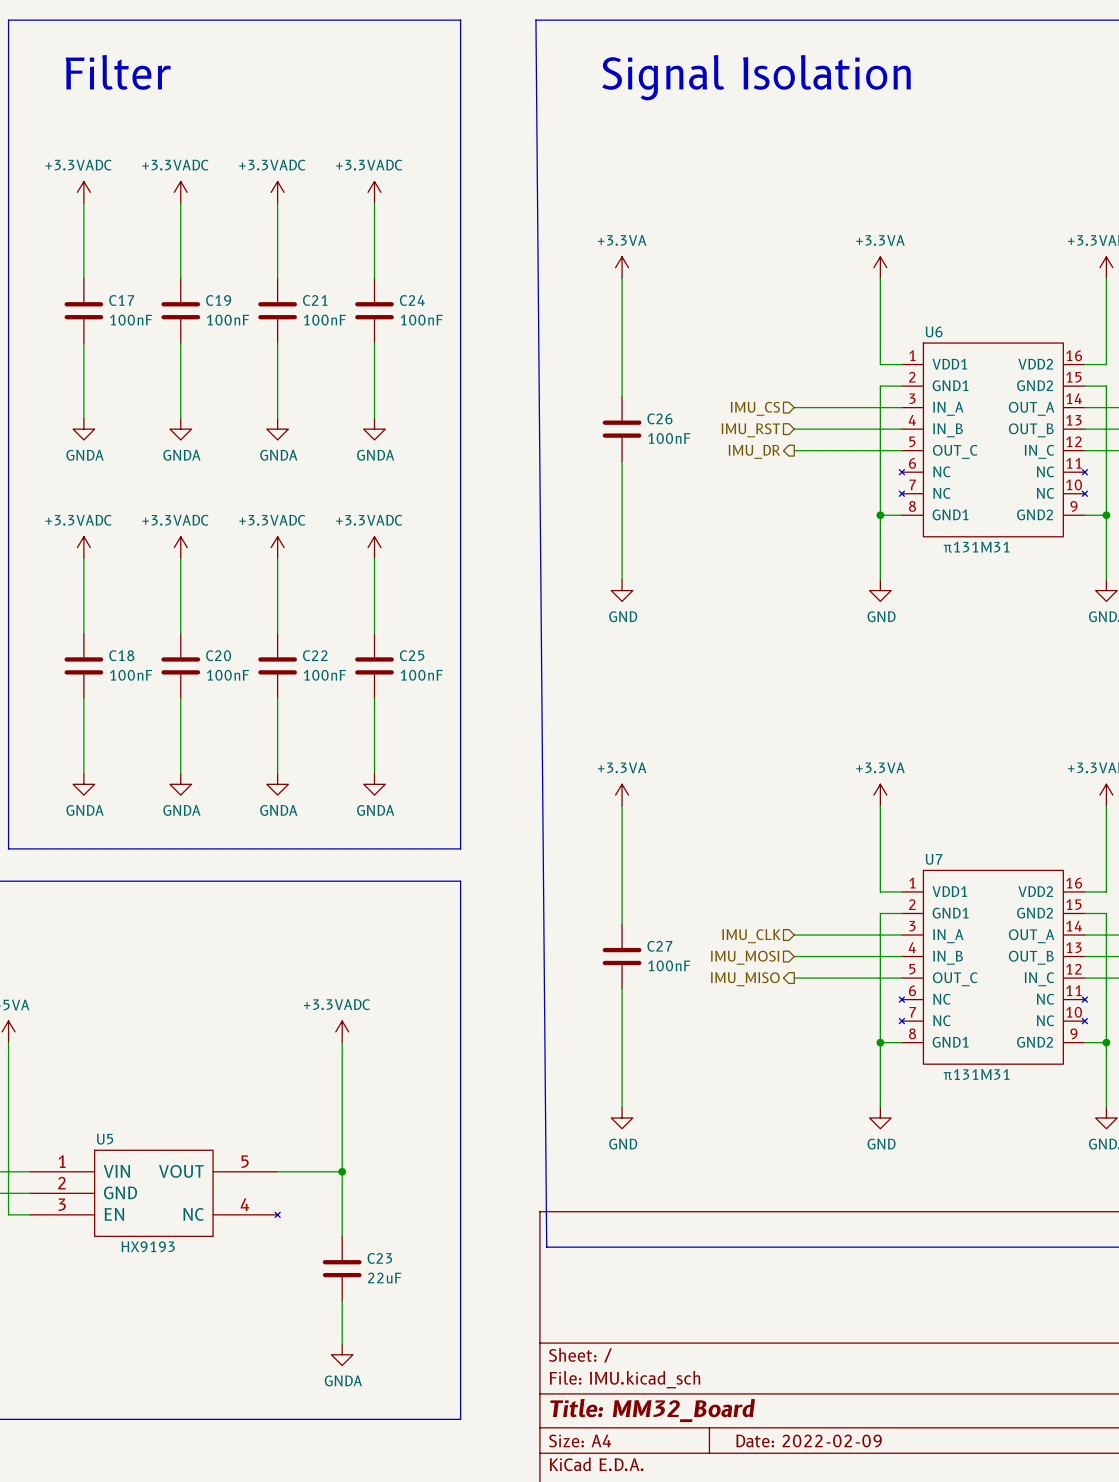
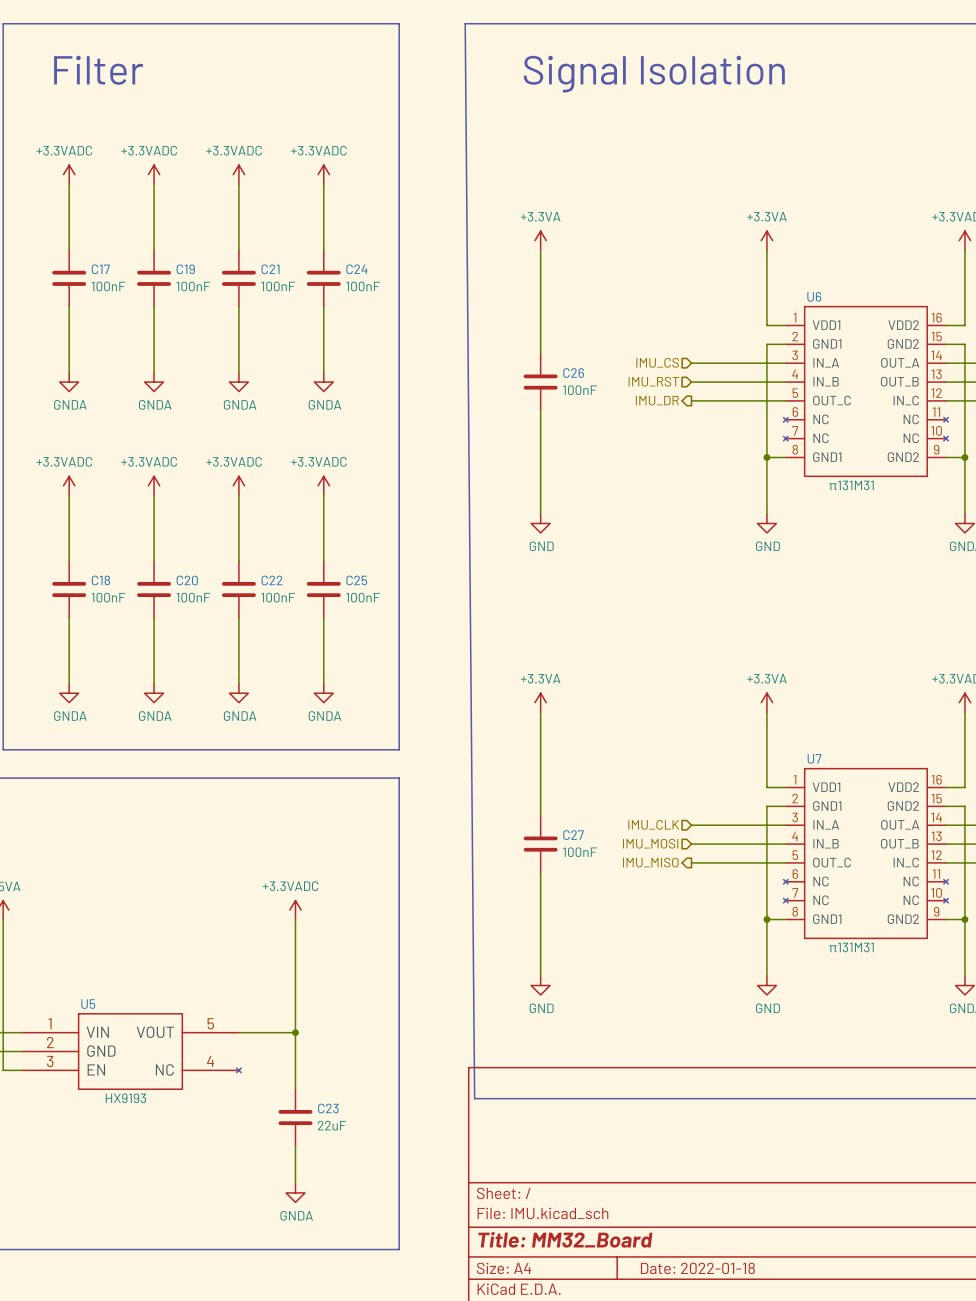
title block: Date: 2022-02-09 (809, 1441) -> Date: 2022-01-18 (697, 1268)

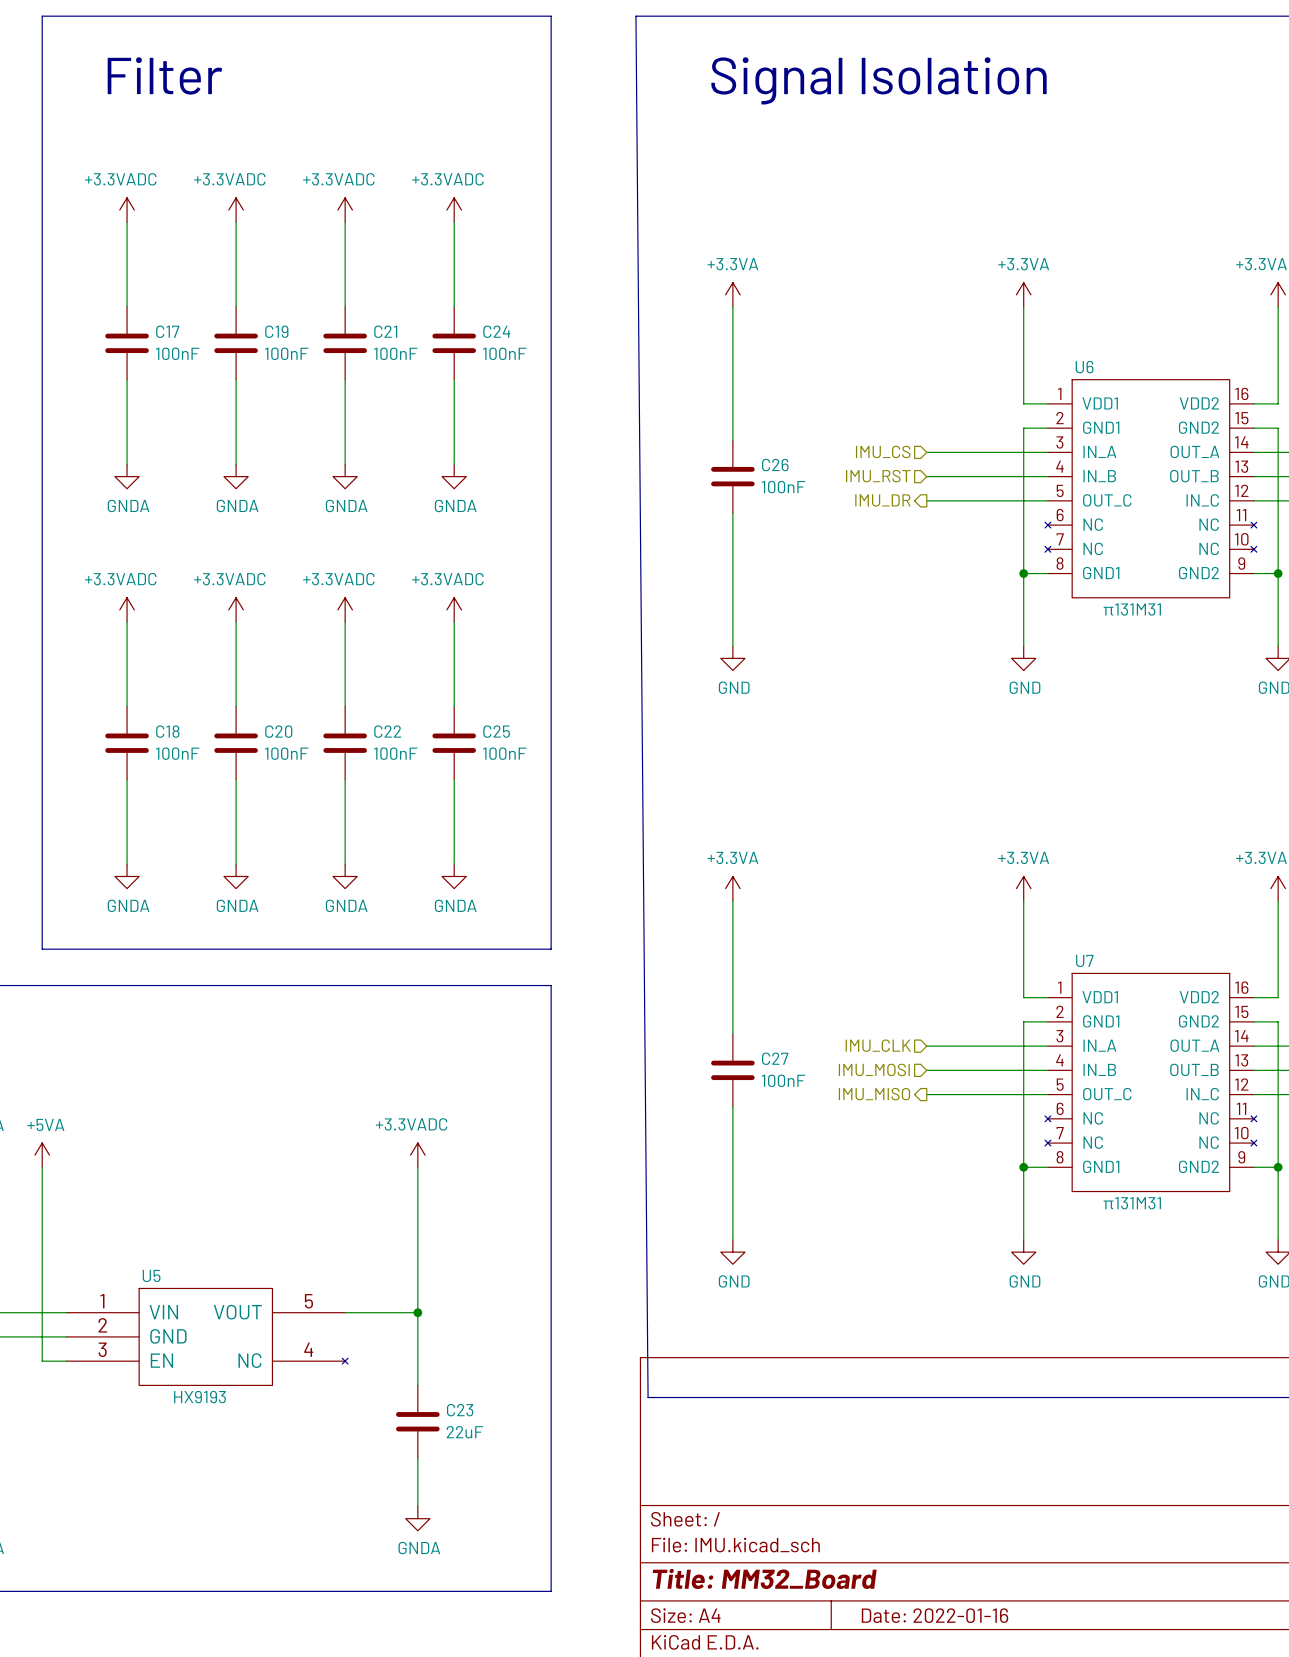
title block: Date: 2022-01-18 (697, 1268) -> Date: 2022-01-16 (935, 1615)

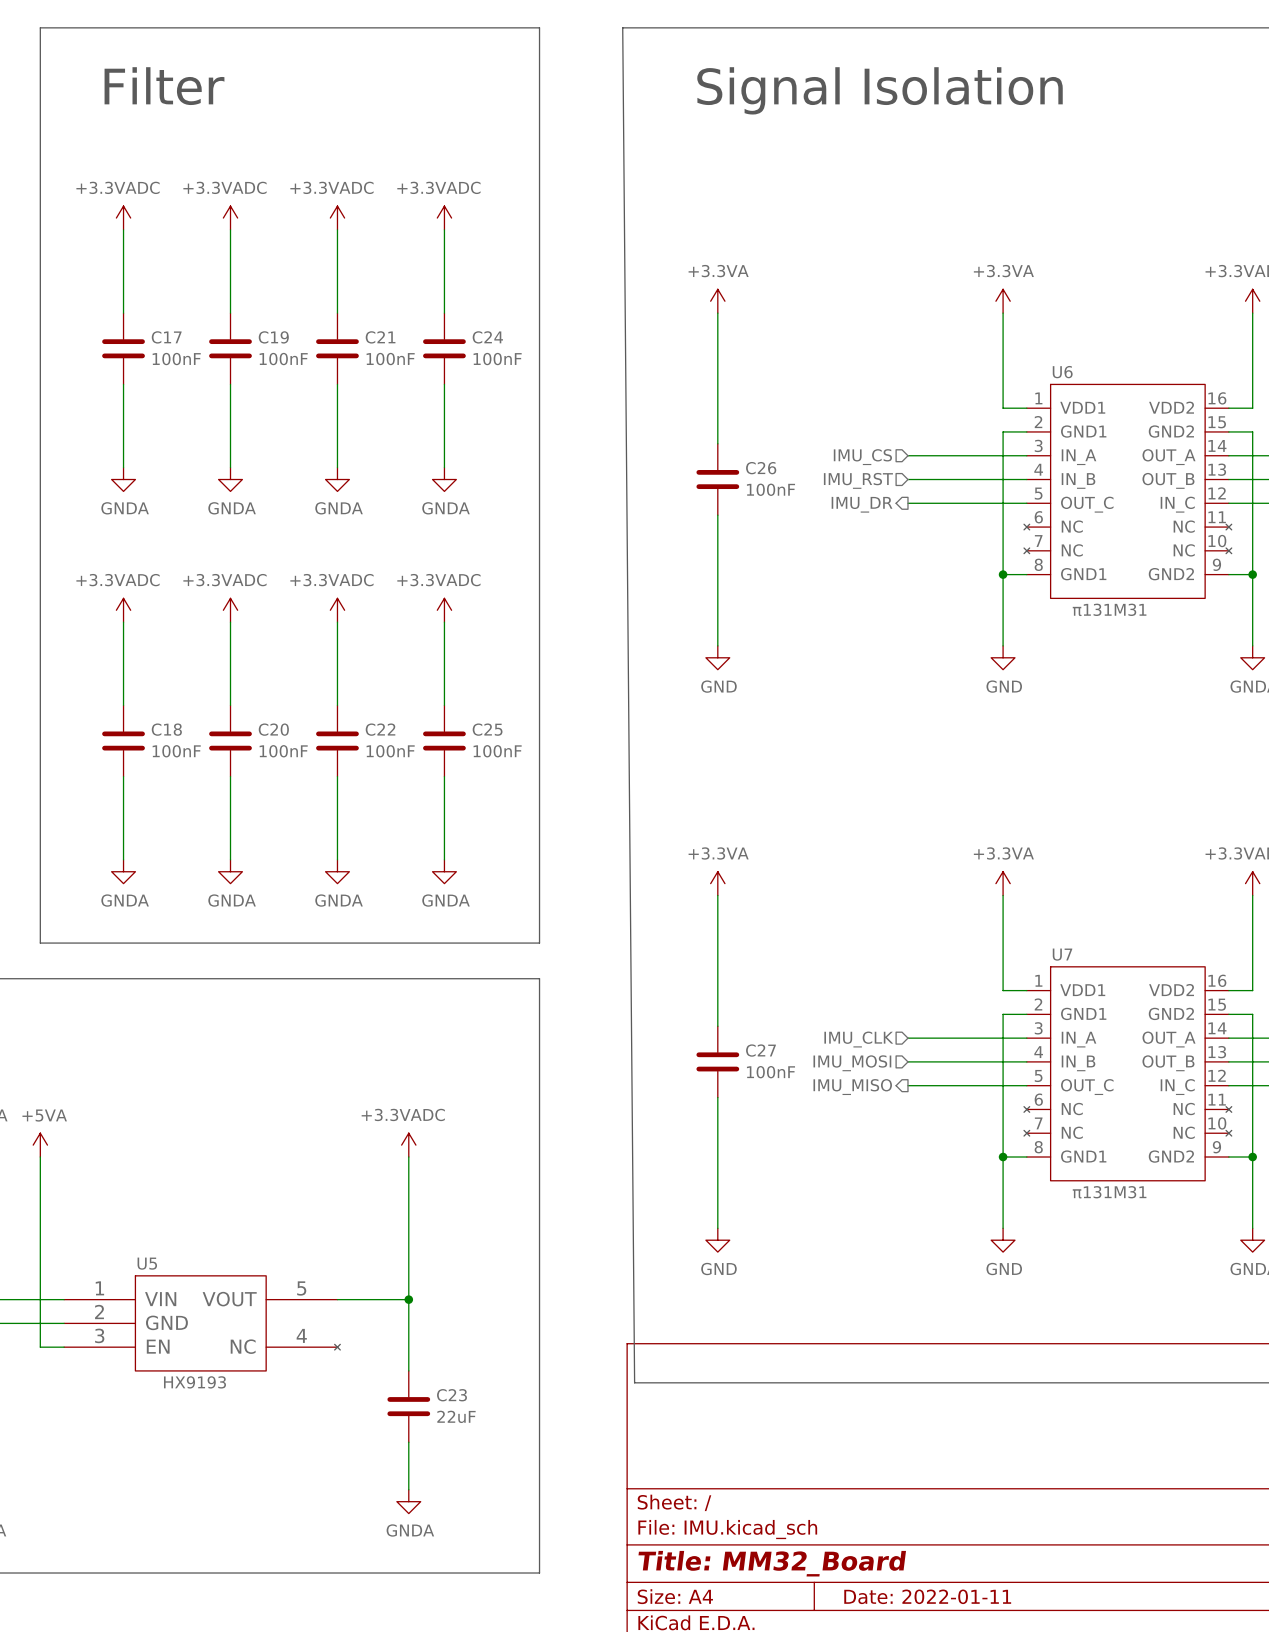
title block: Date: 2022-01-16 (935, 1615) -> Date: 2022-01-11 (927, 1596)

